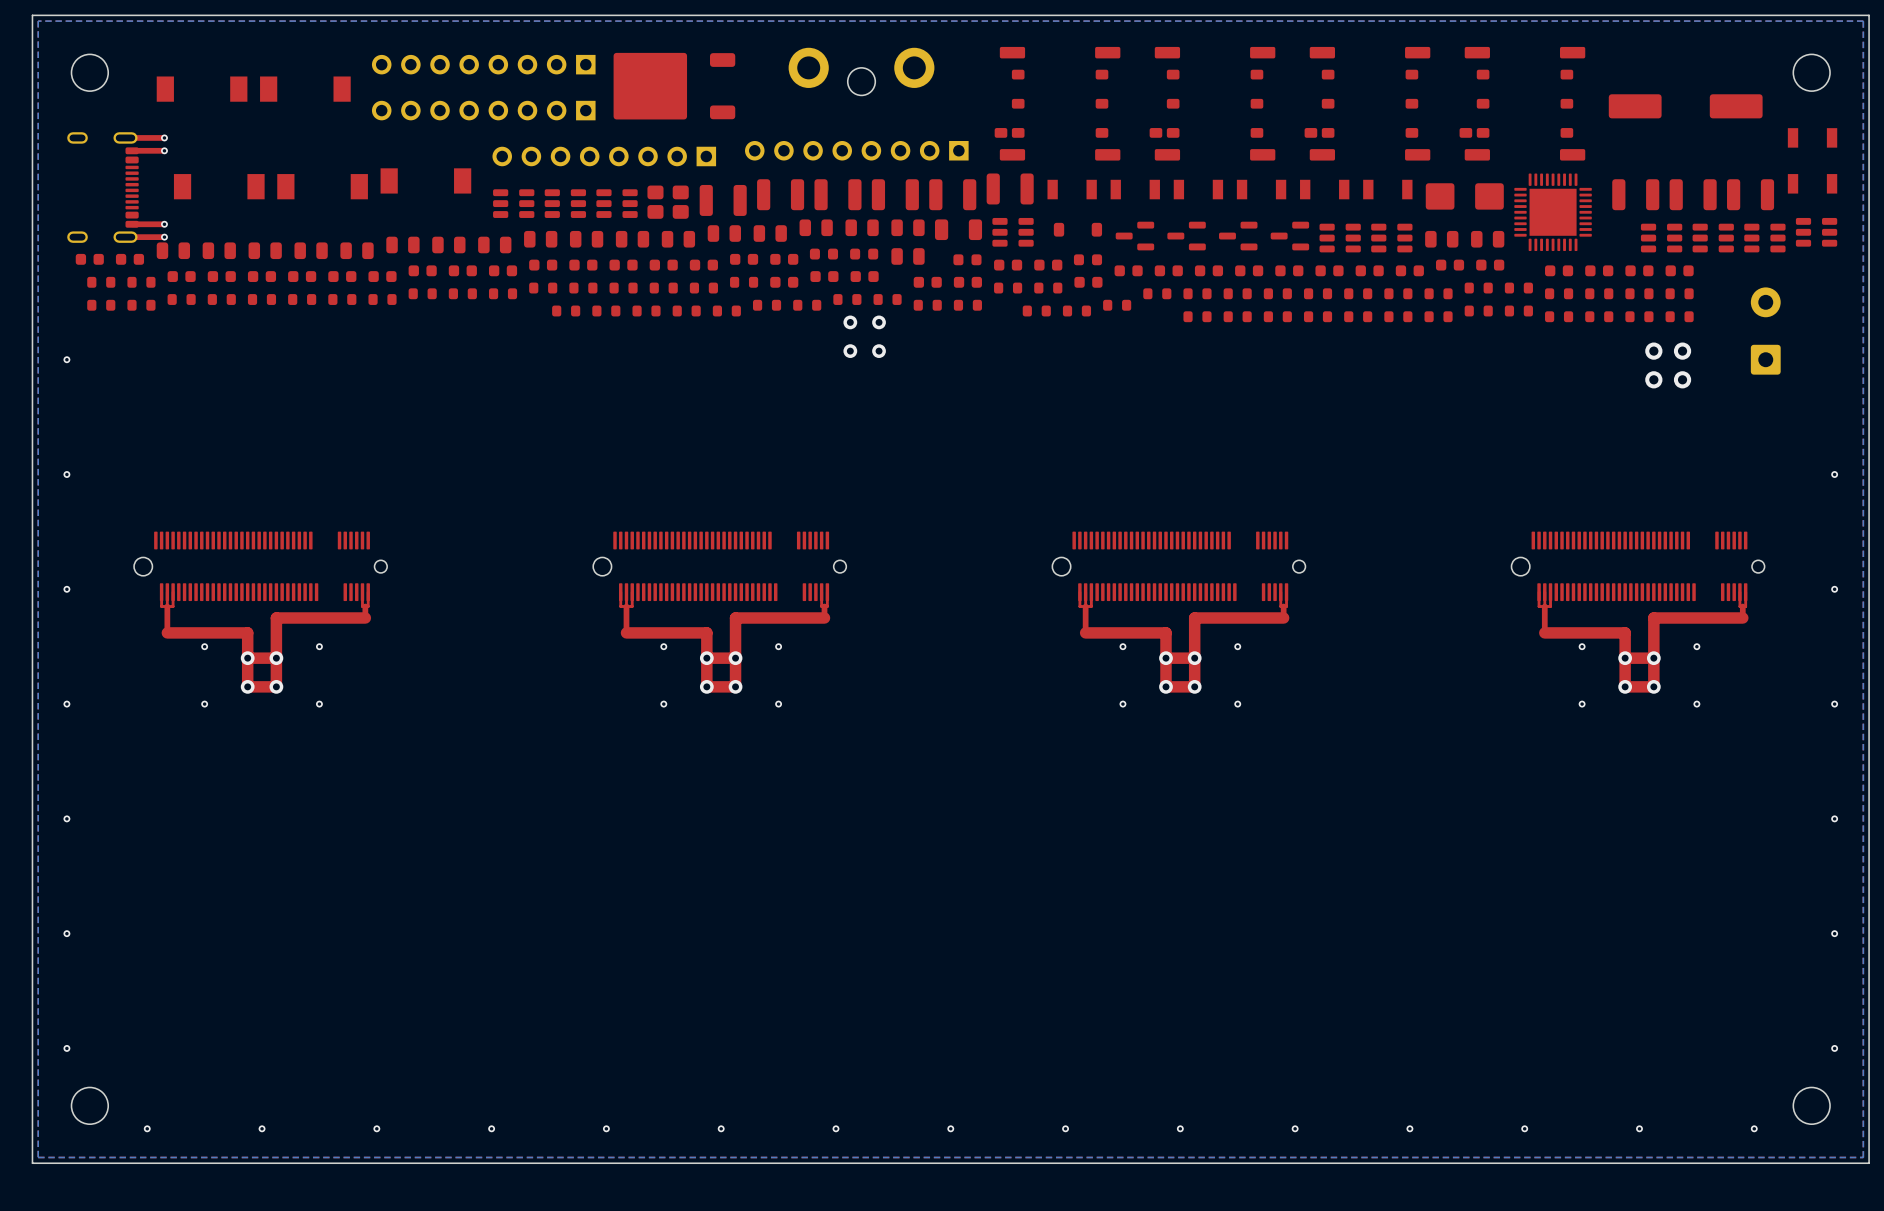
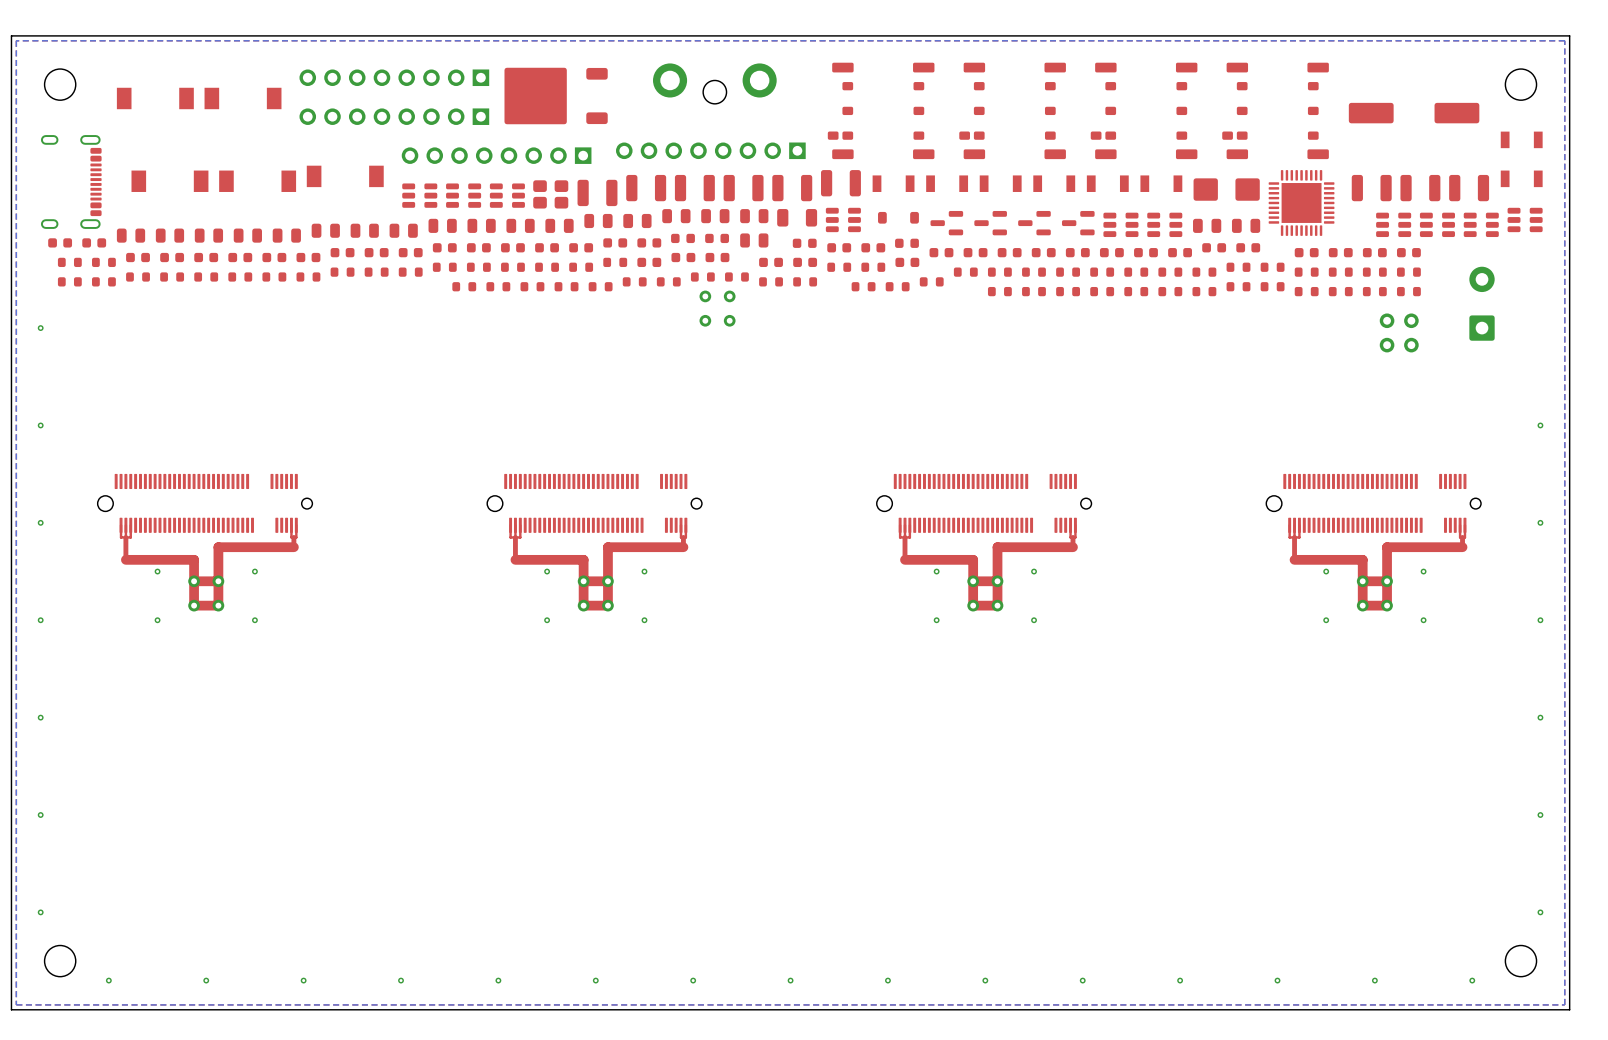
top track: (164, 137) (125, 137) -> none
via: (164, 137) -> none
top track: (164, 150) (132, 150) -> none
via: (164, 150) -> none
top track: (164, 224) (132, 224) -> none
via: (164, 224) -> none
top track: (164, 237) (125, 237) -> none
via: (164, 237) -> none

